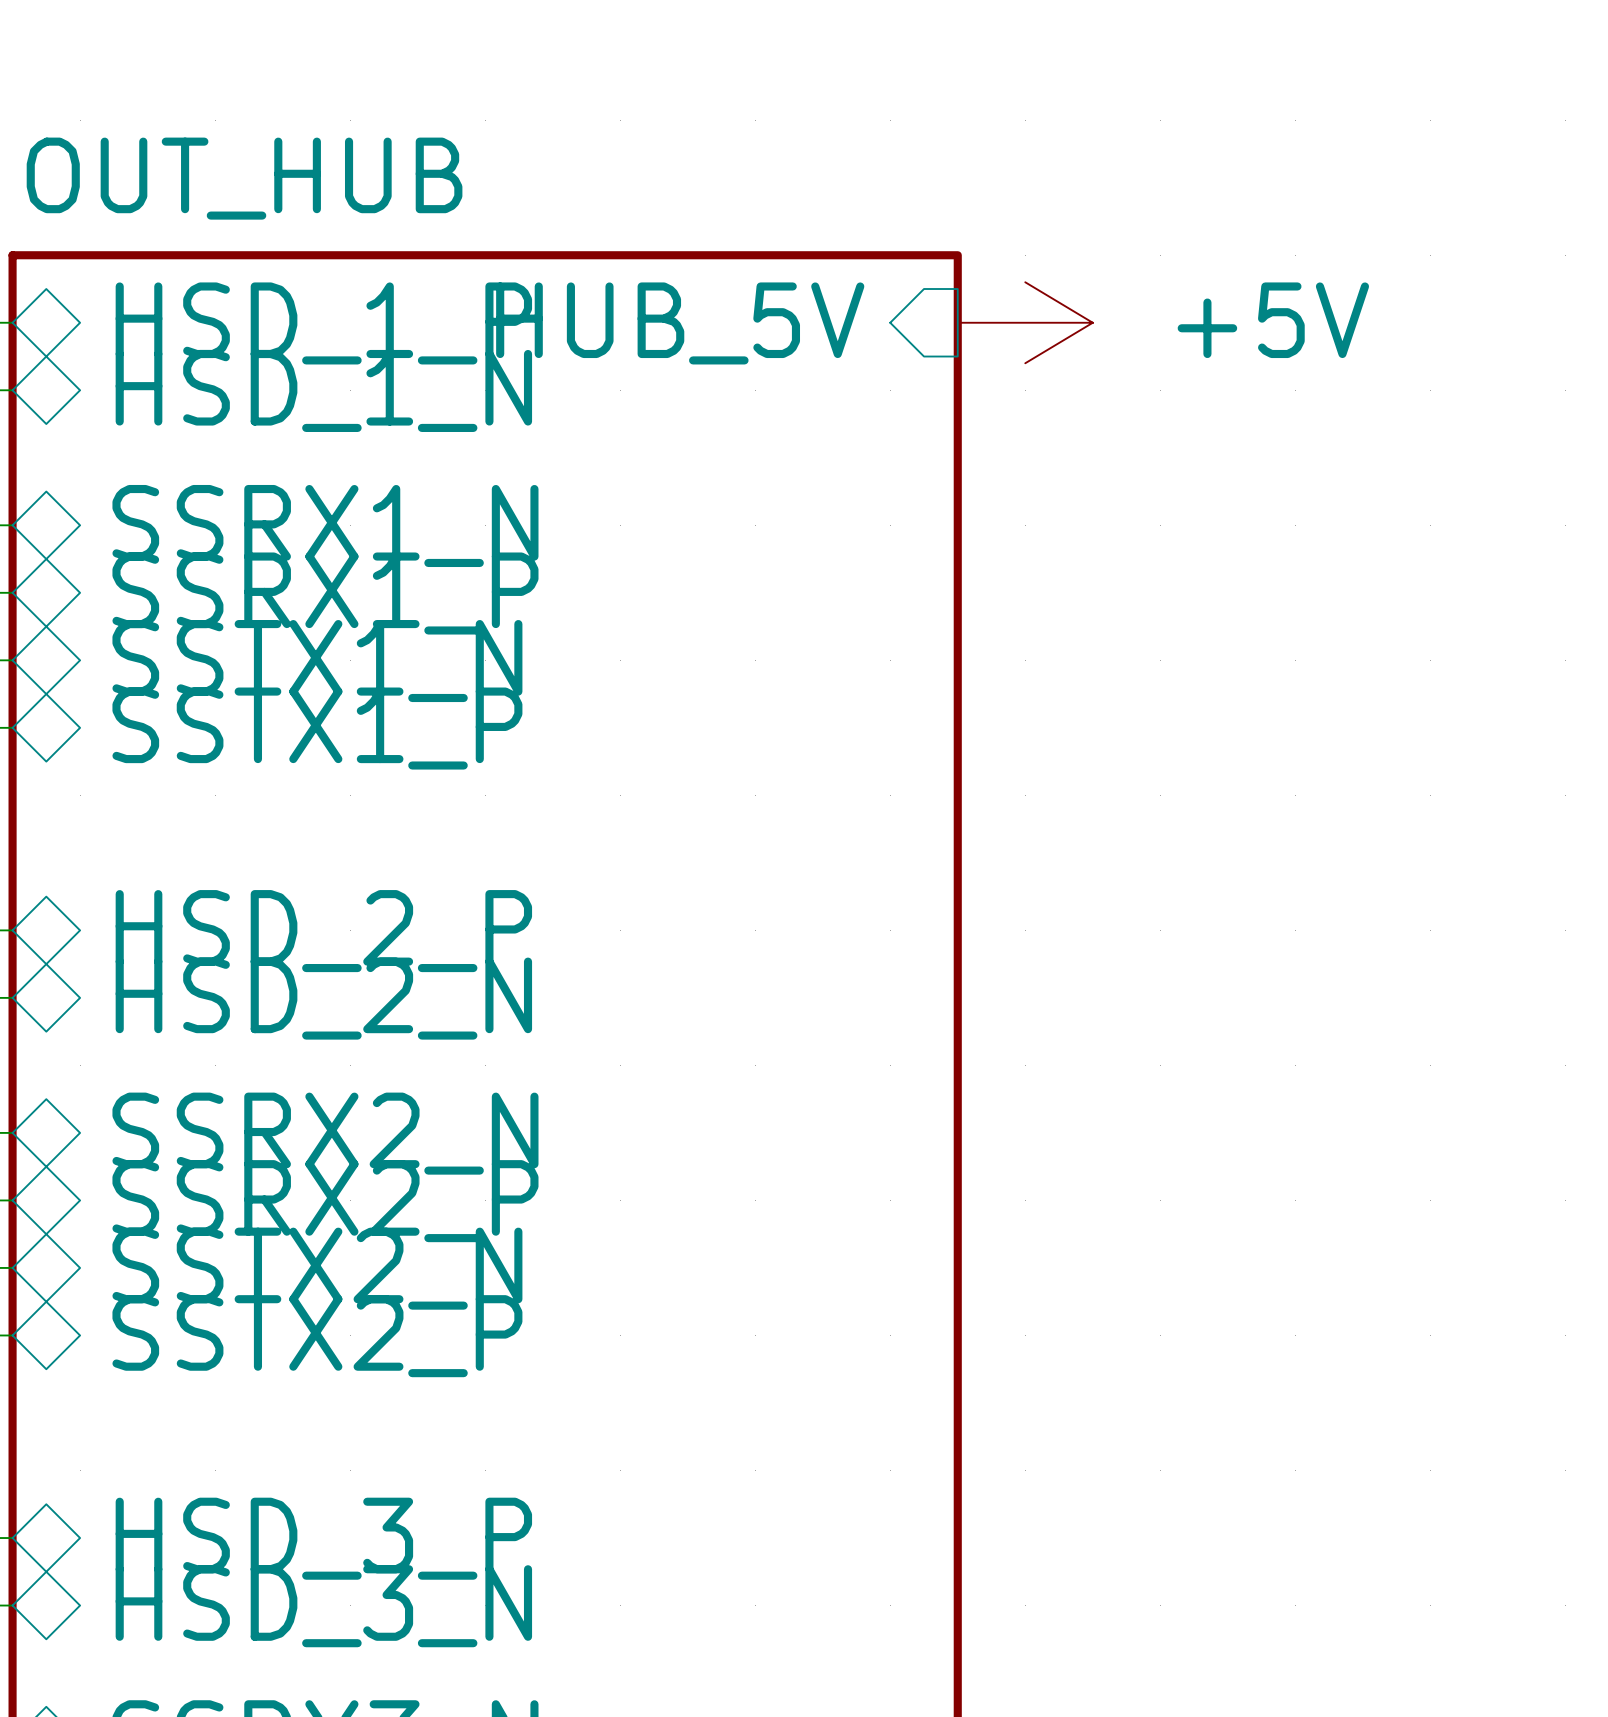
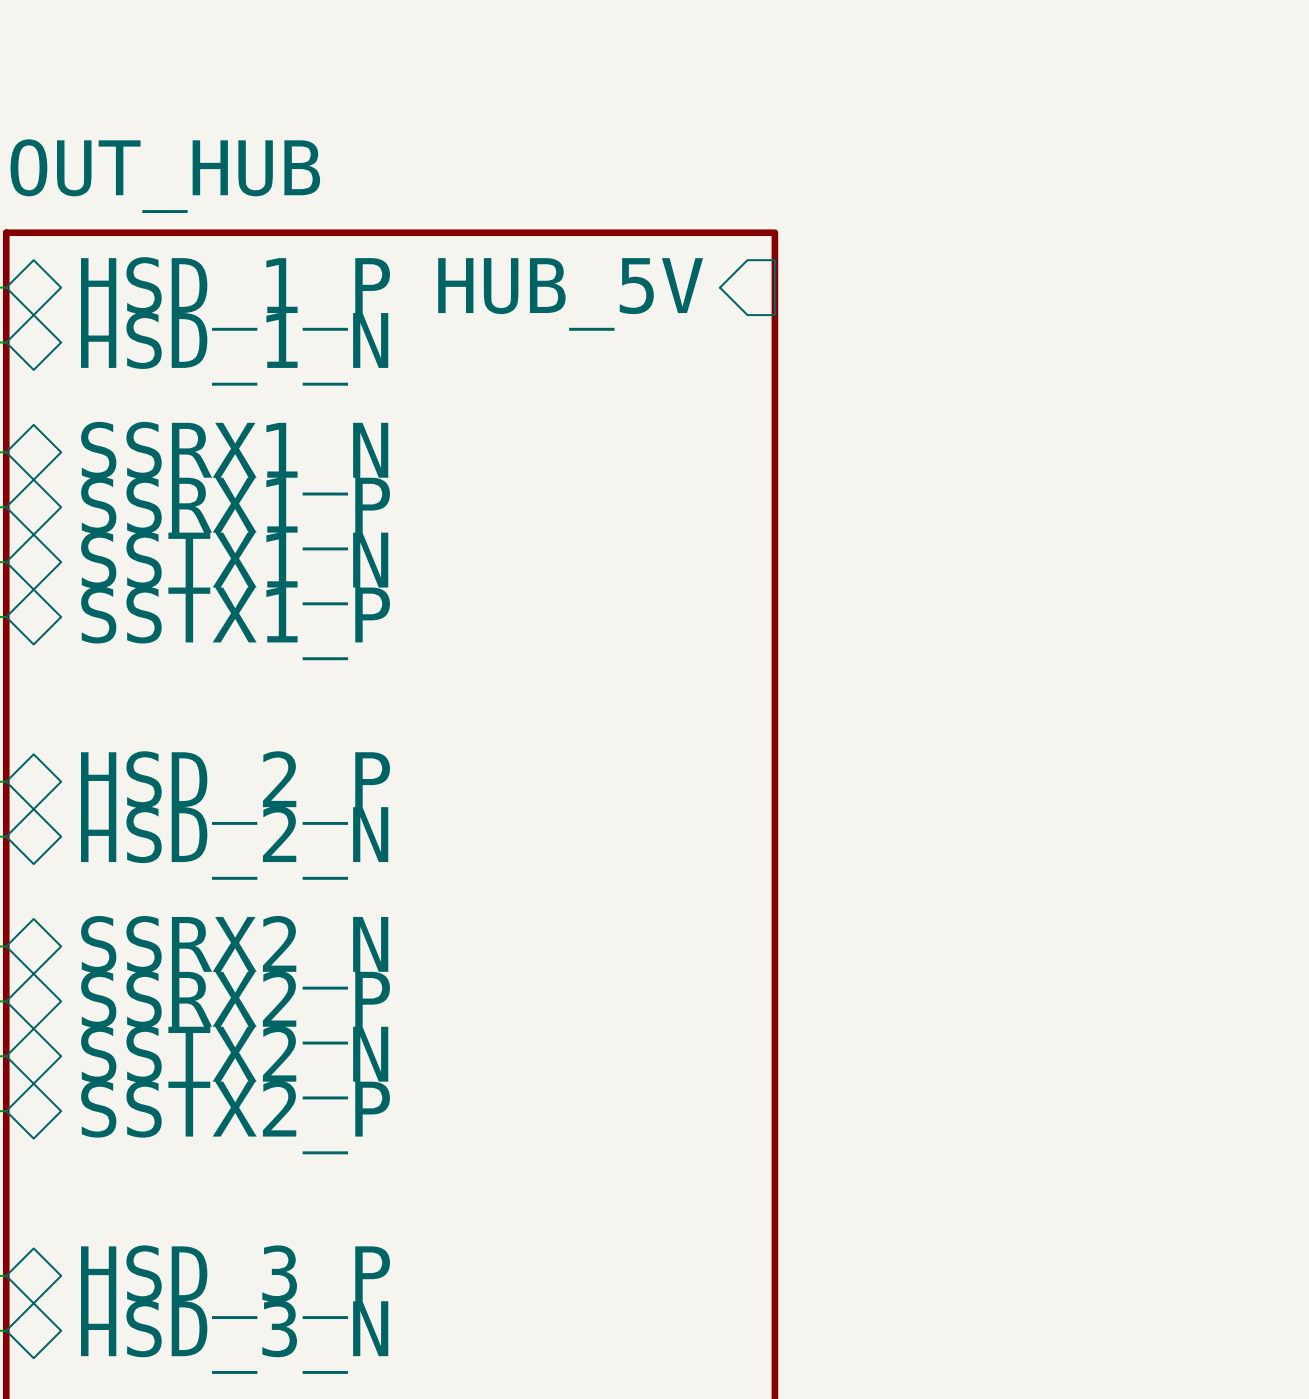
power symbol: +5V (1025, 322) -> none

